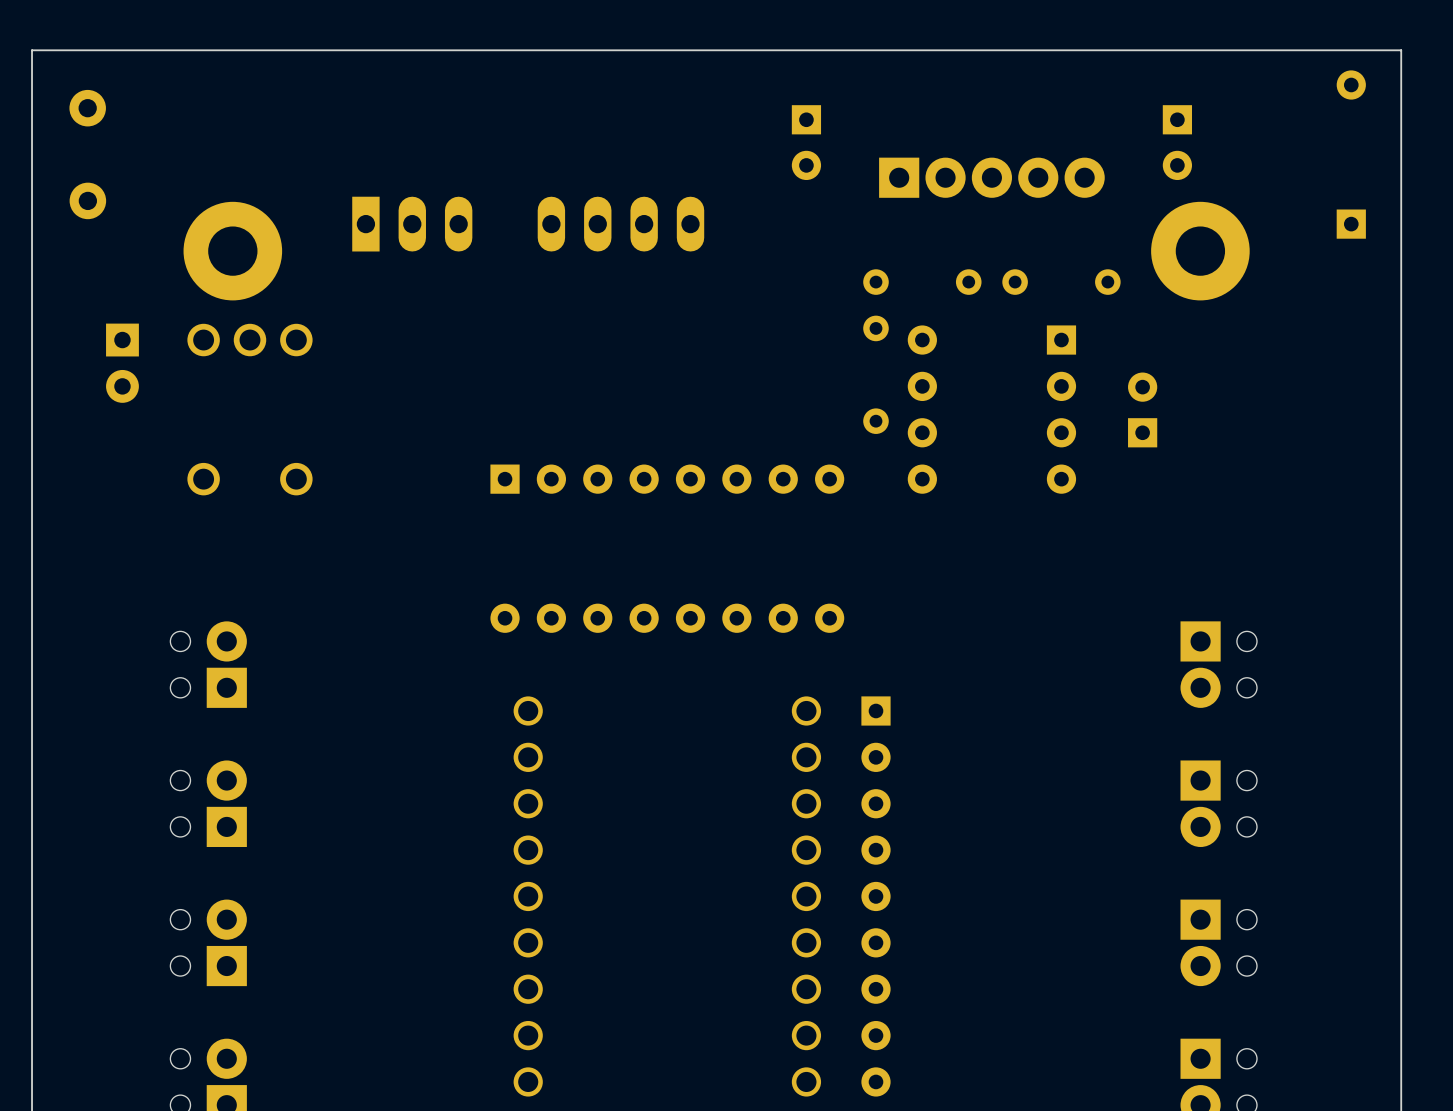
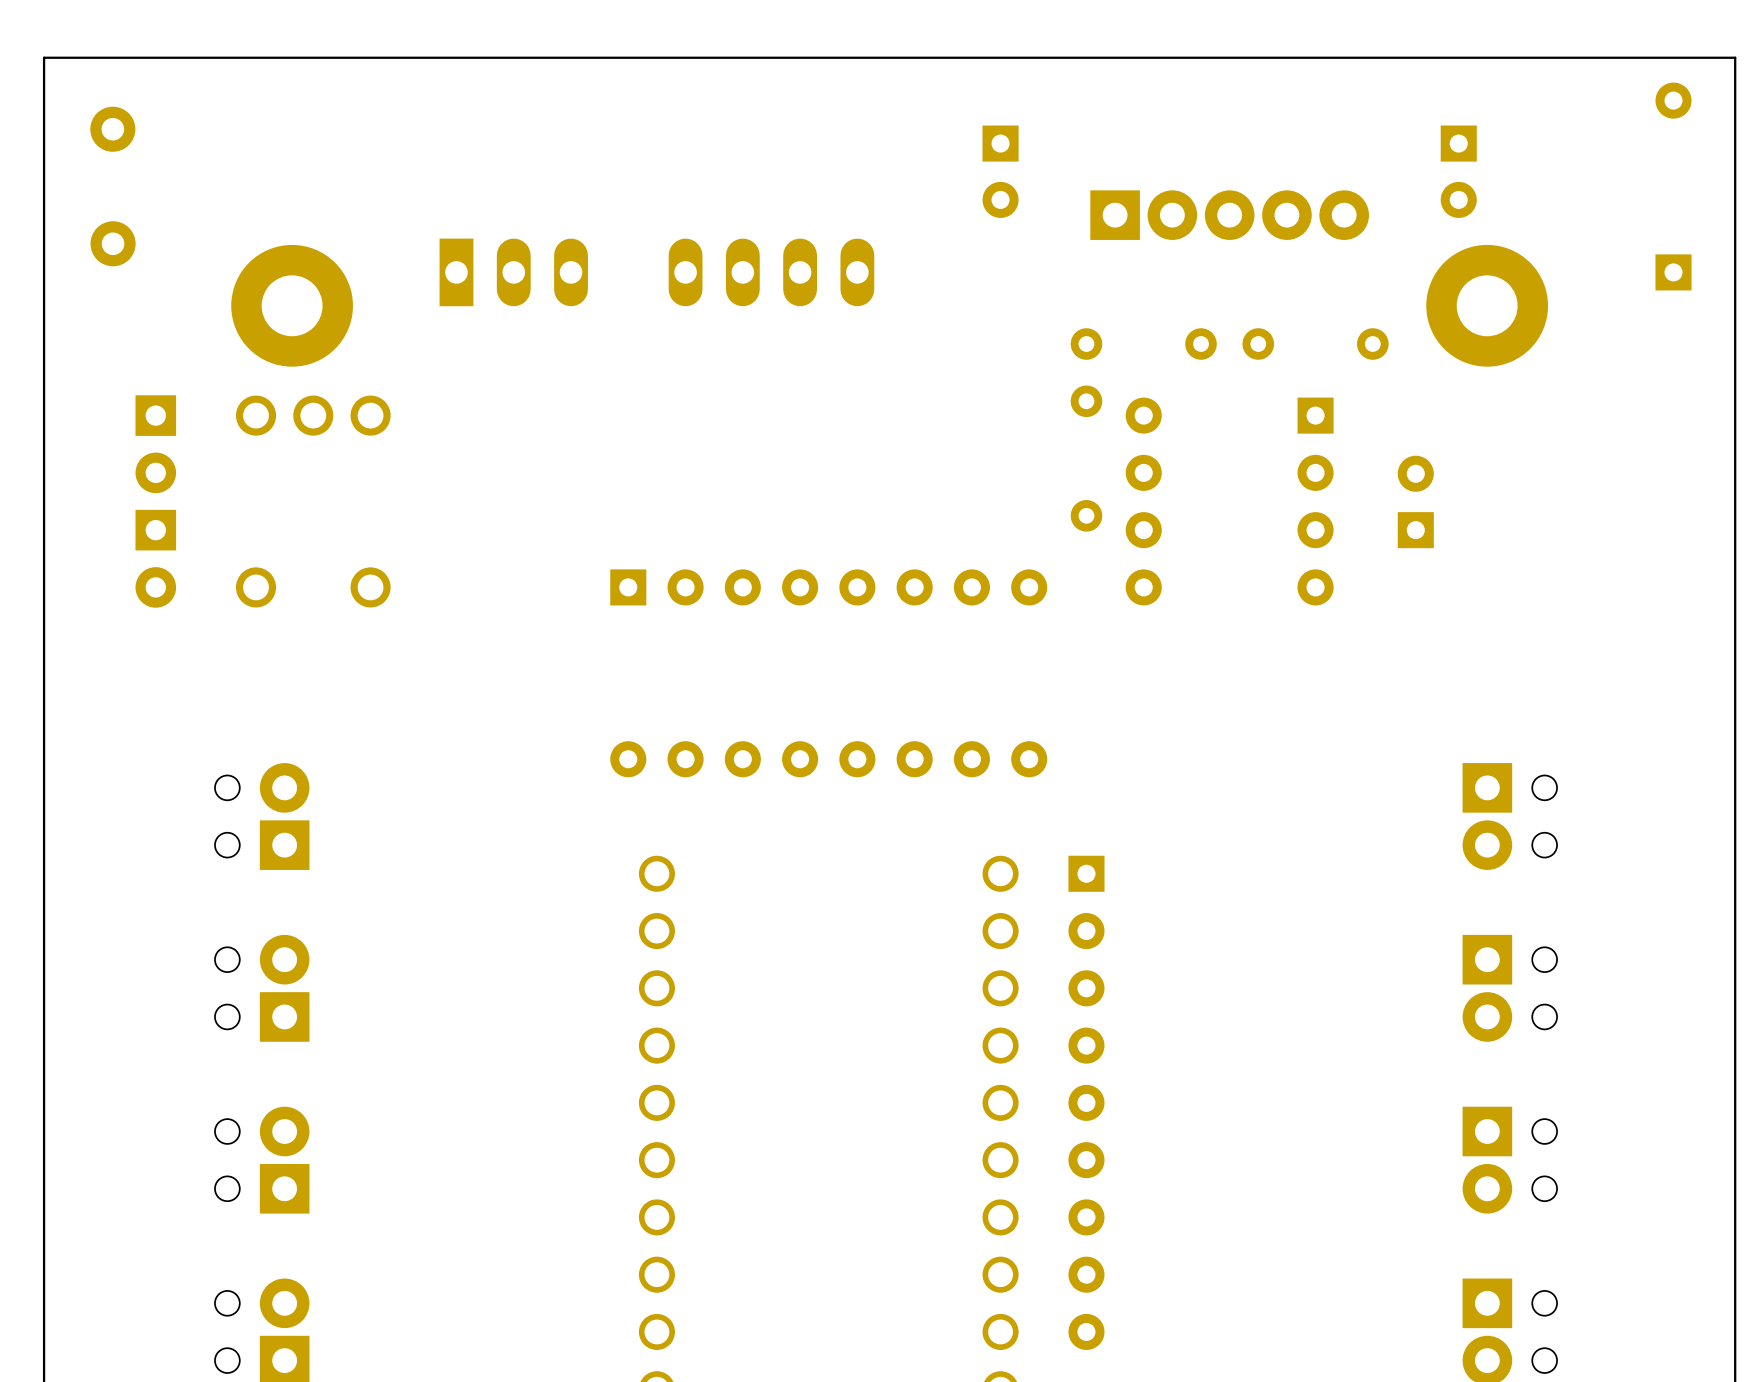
part: none -> (155, 558)

